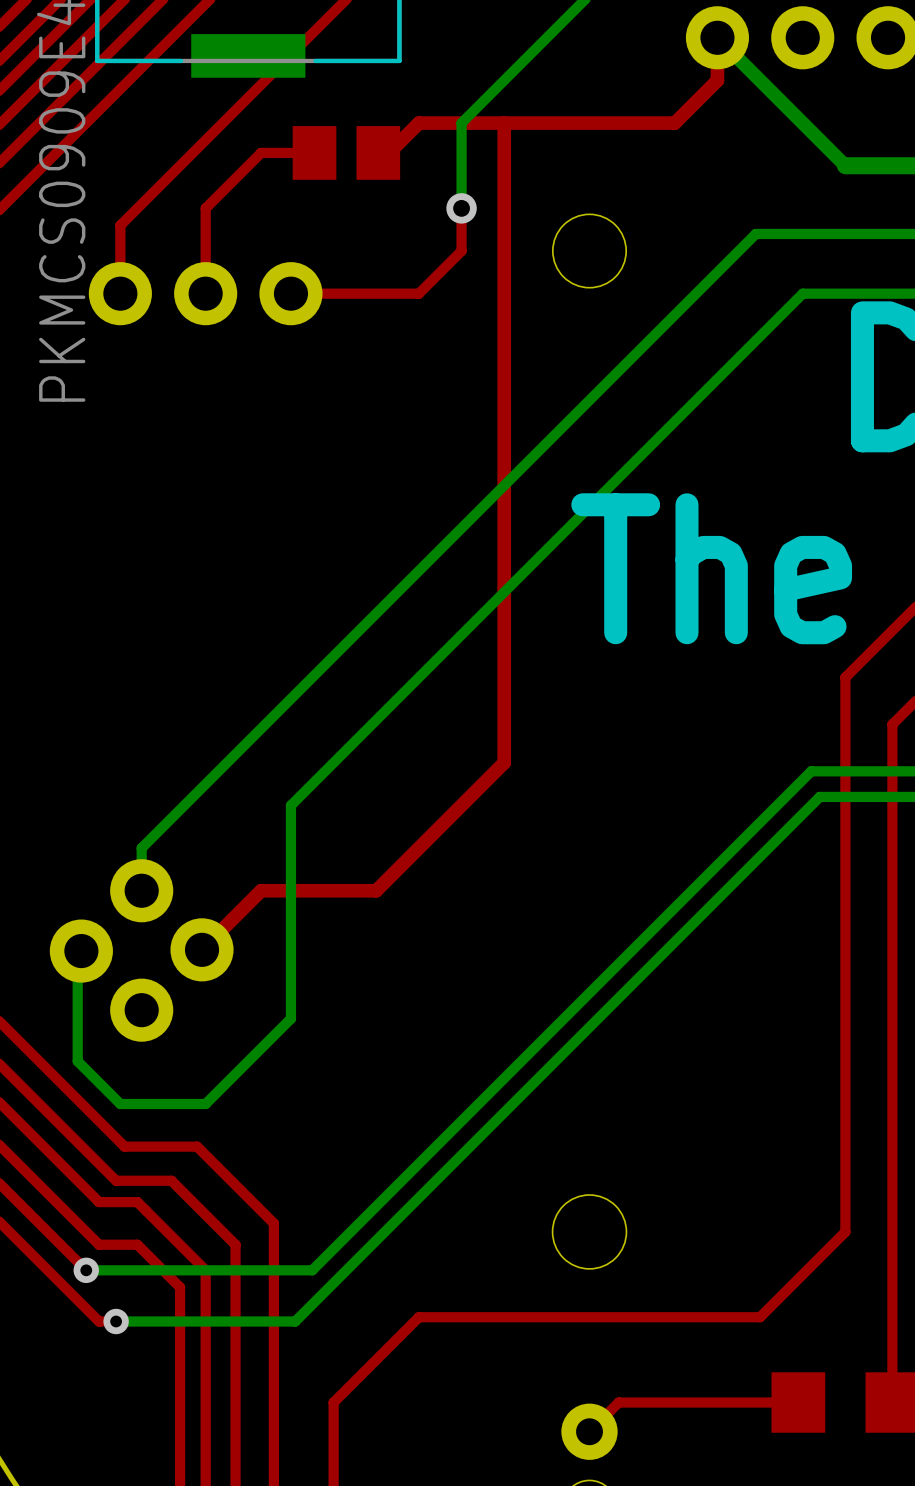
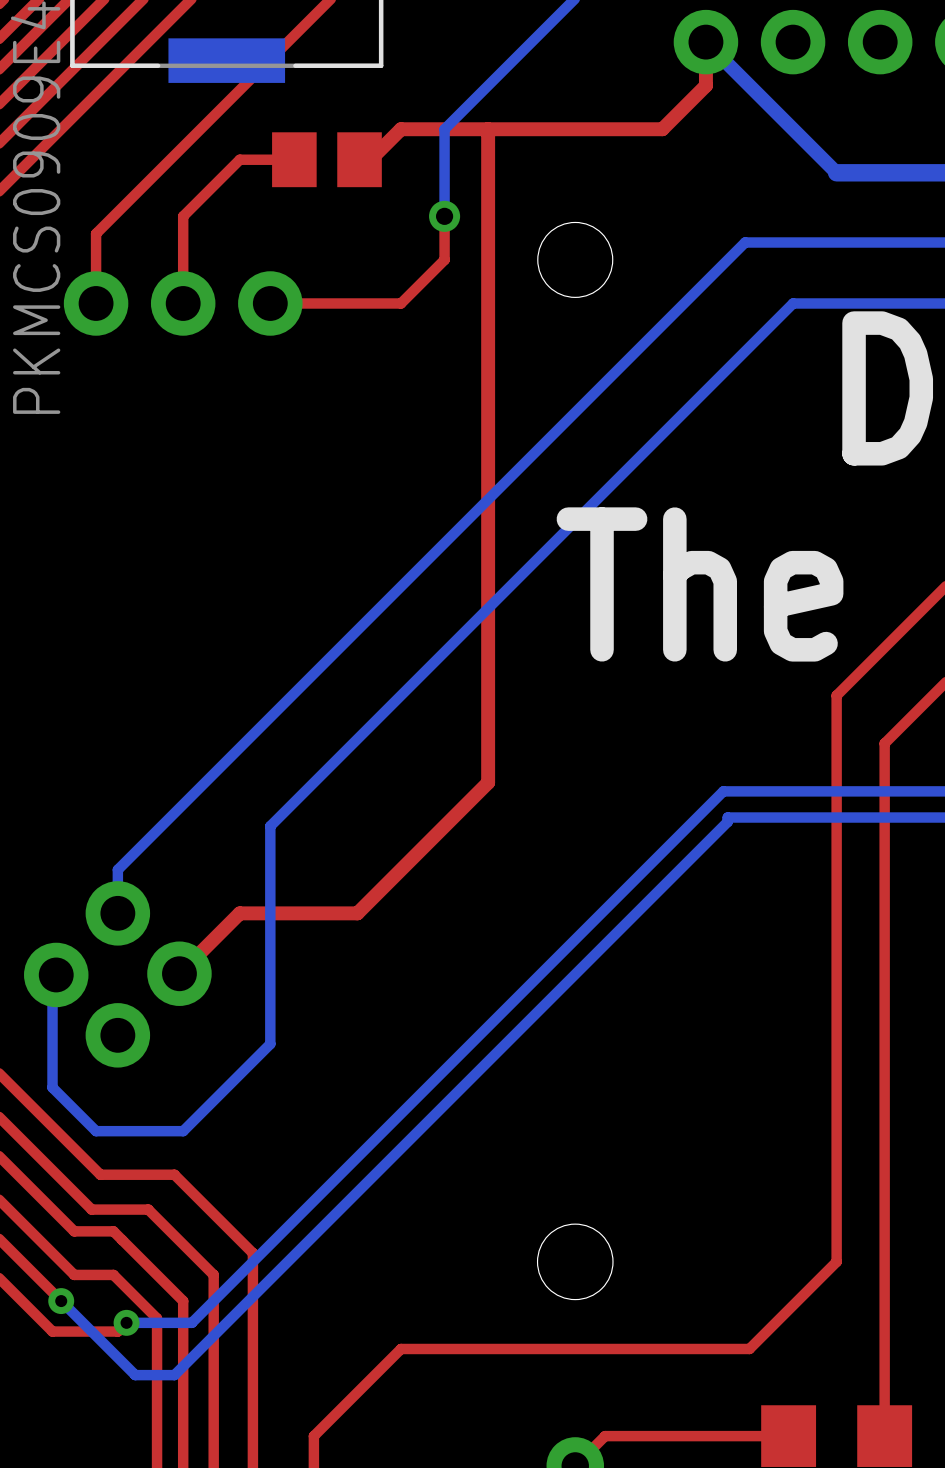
bottom track: (811, 771) (312, 1270) (86, 1270) -> (810, 817) (727, 817) (727, 821) (174, 1375) (135, 1375) (61, 1301)
bottom track: none -> (801, 791) (723, 791) (191, 1322) (126, 1322)
bottom track: (819, 796) (295, 1321) (116, 1321) -> none
top track: (77, 1300) (99, 1321) (116, 1321) -> (52, 1331) (117, 1331) (126, 1322)
via position: (116, 1321) -> (126, 1322)

